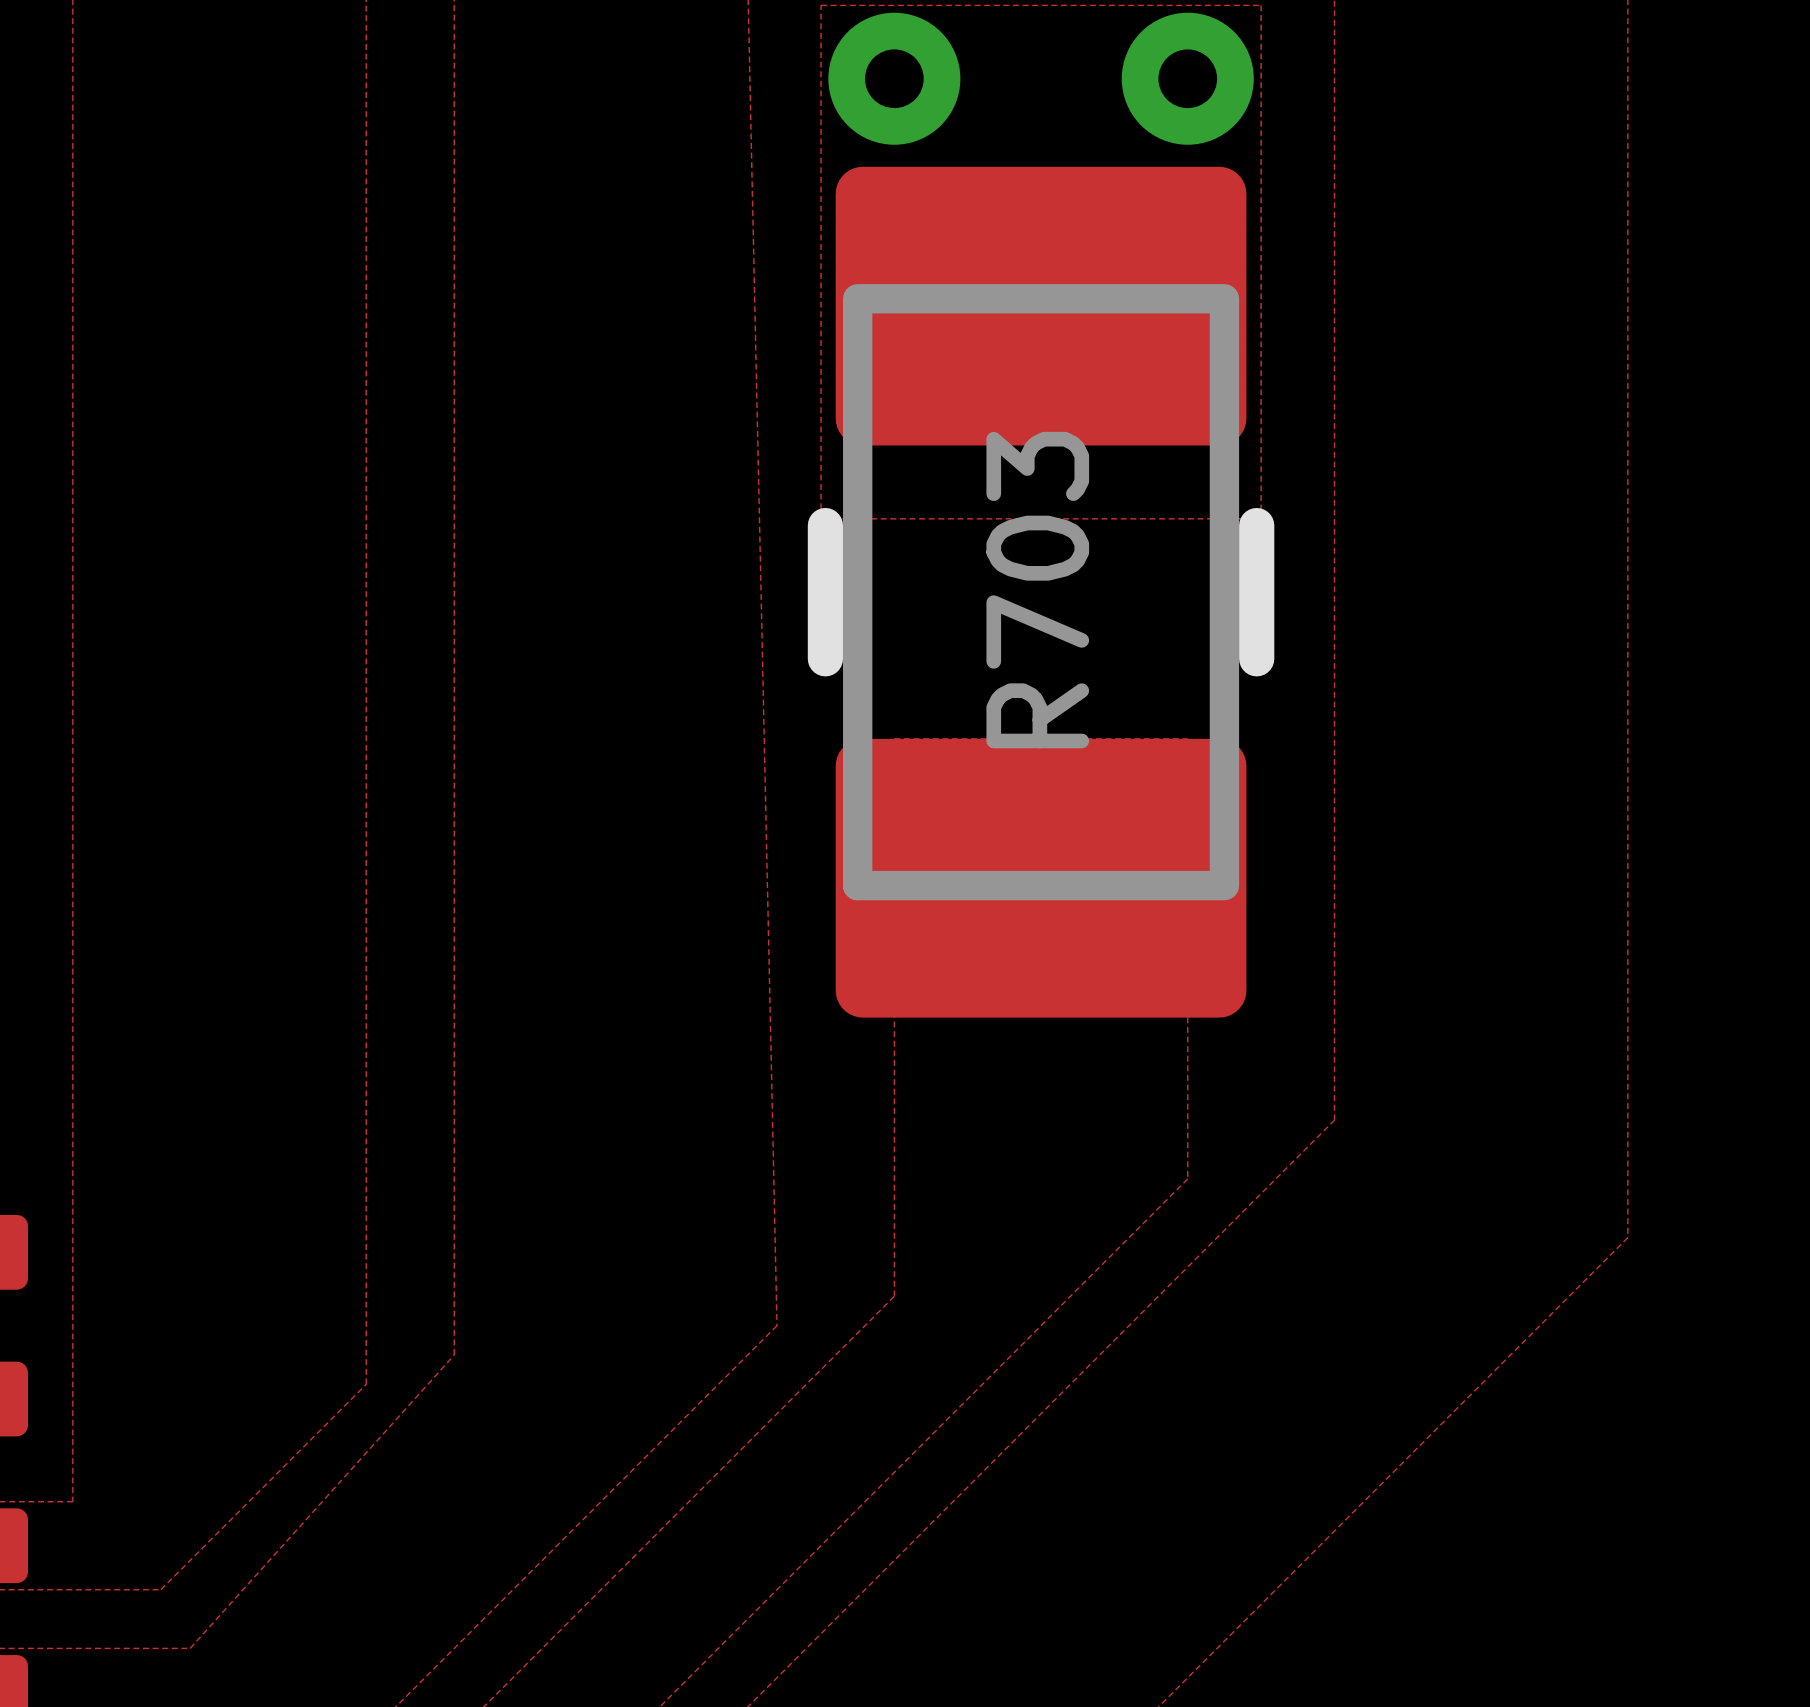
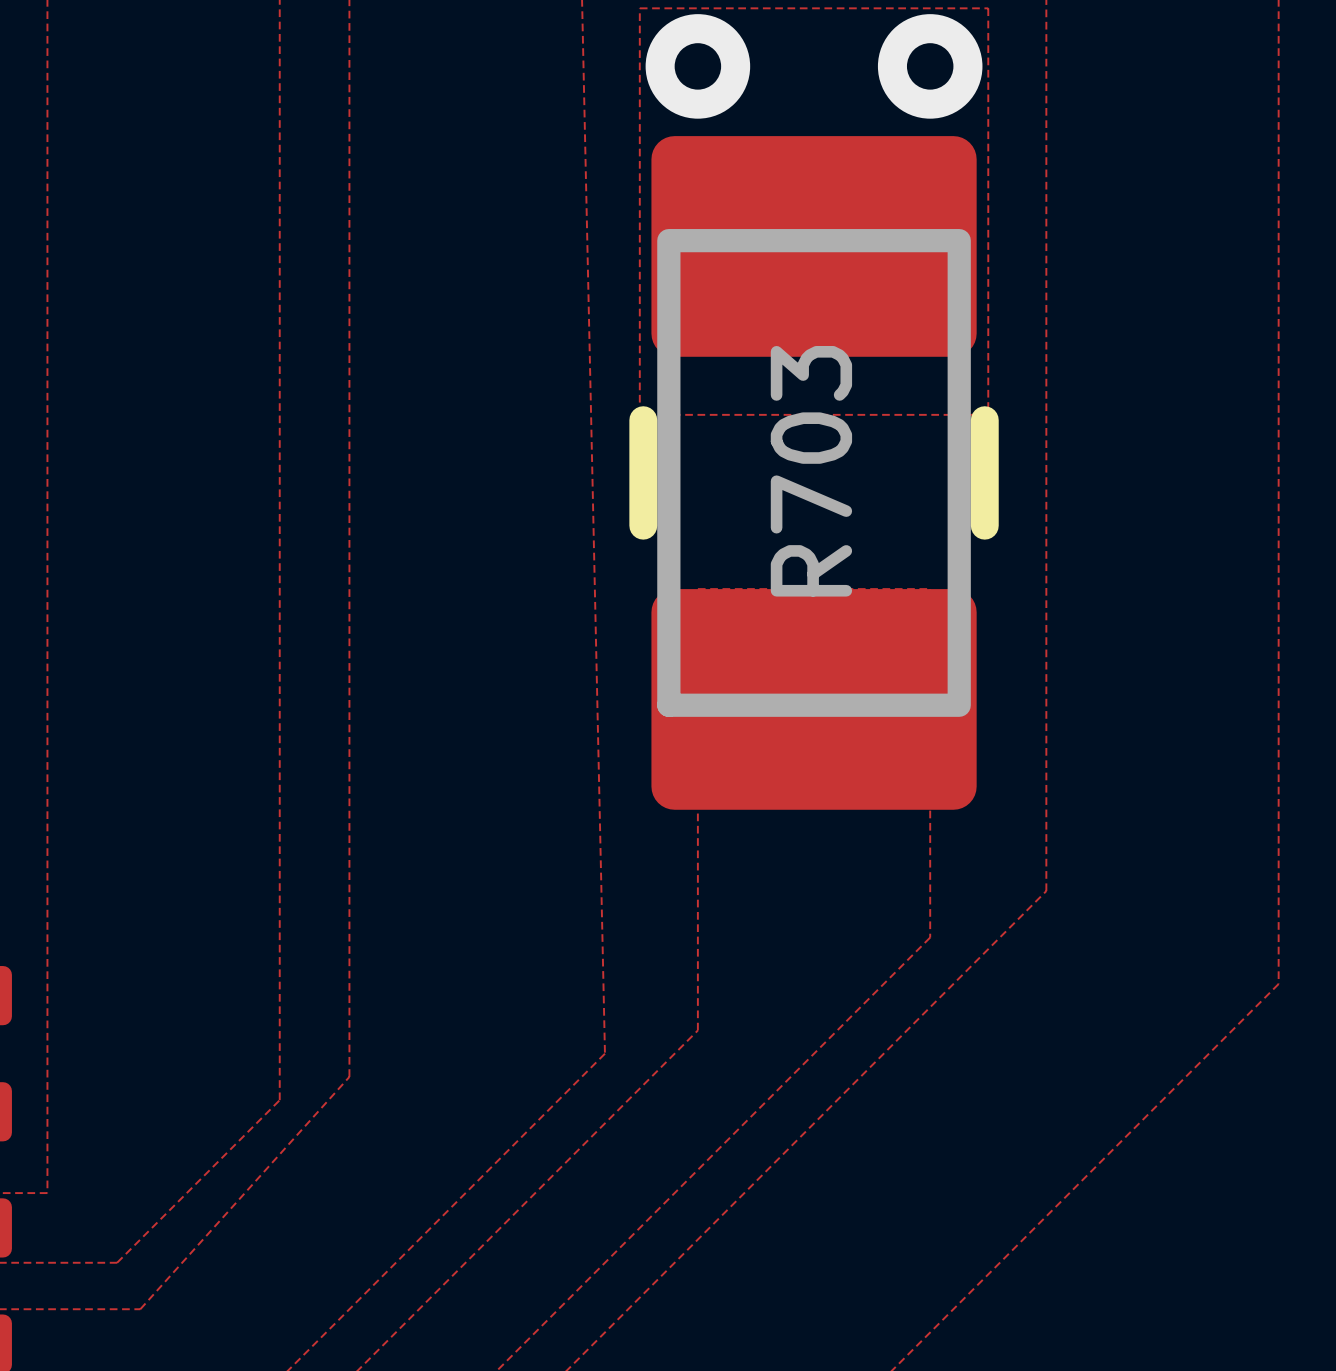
R703 footprint: [807, 166, 1275, 1018] -> [629, 136, 999, 810]

